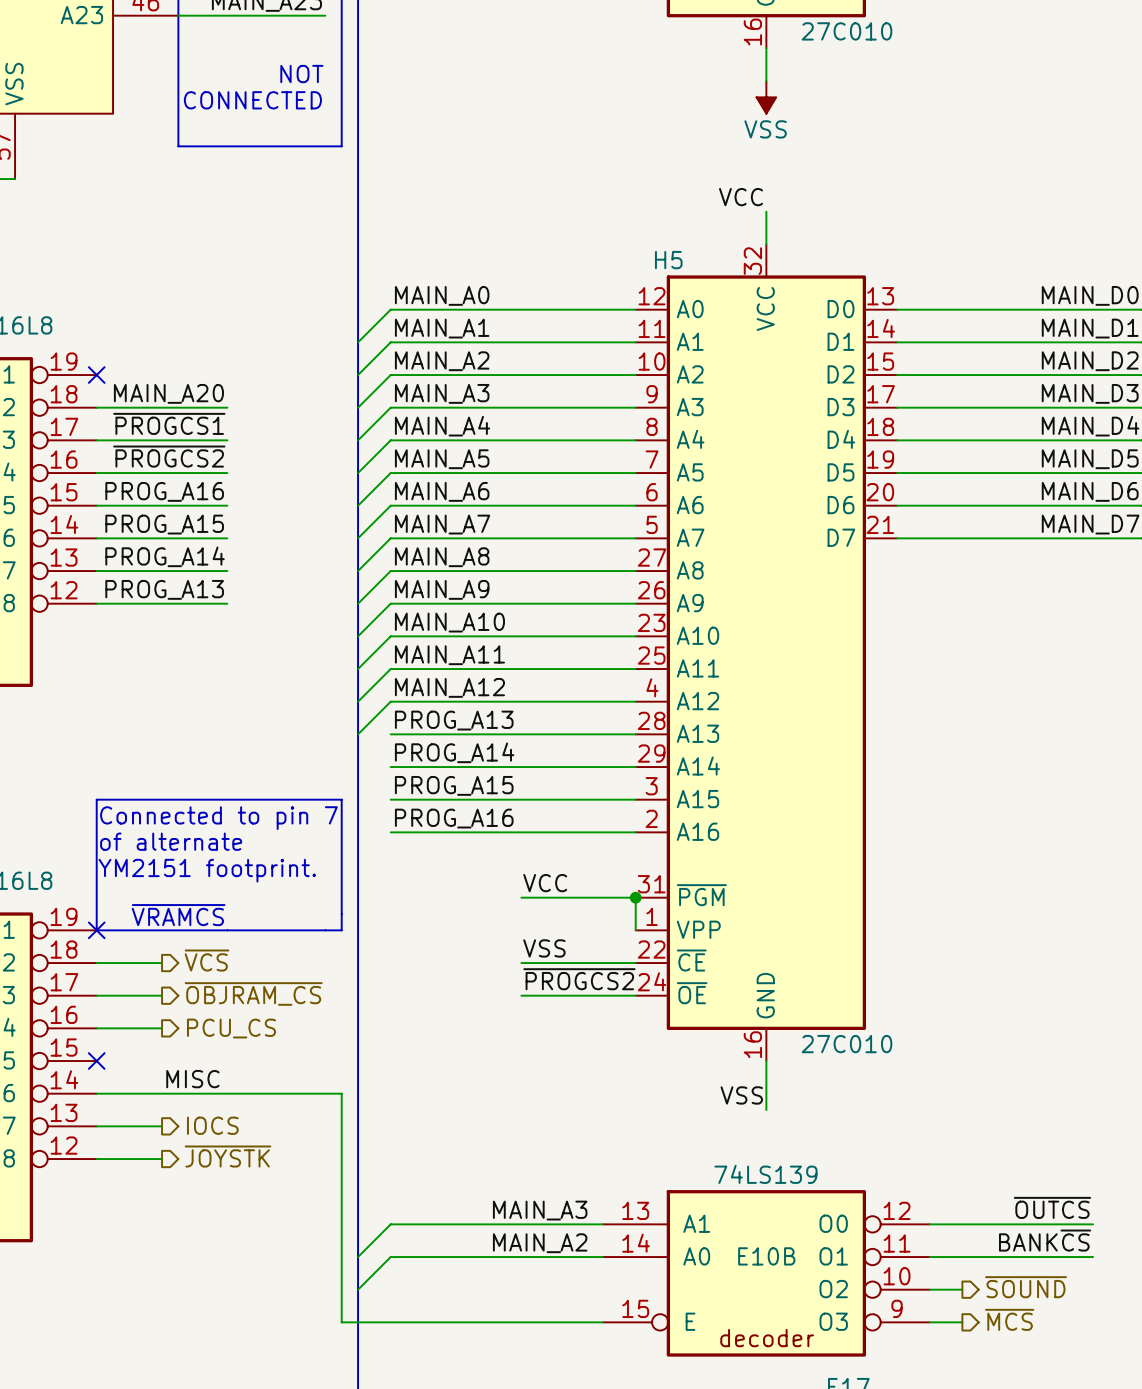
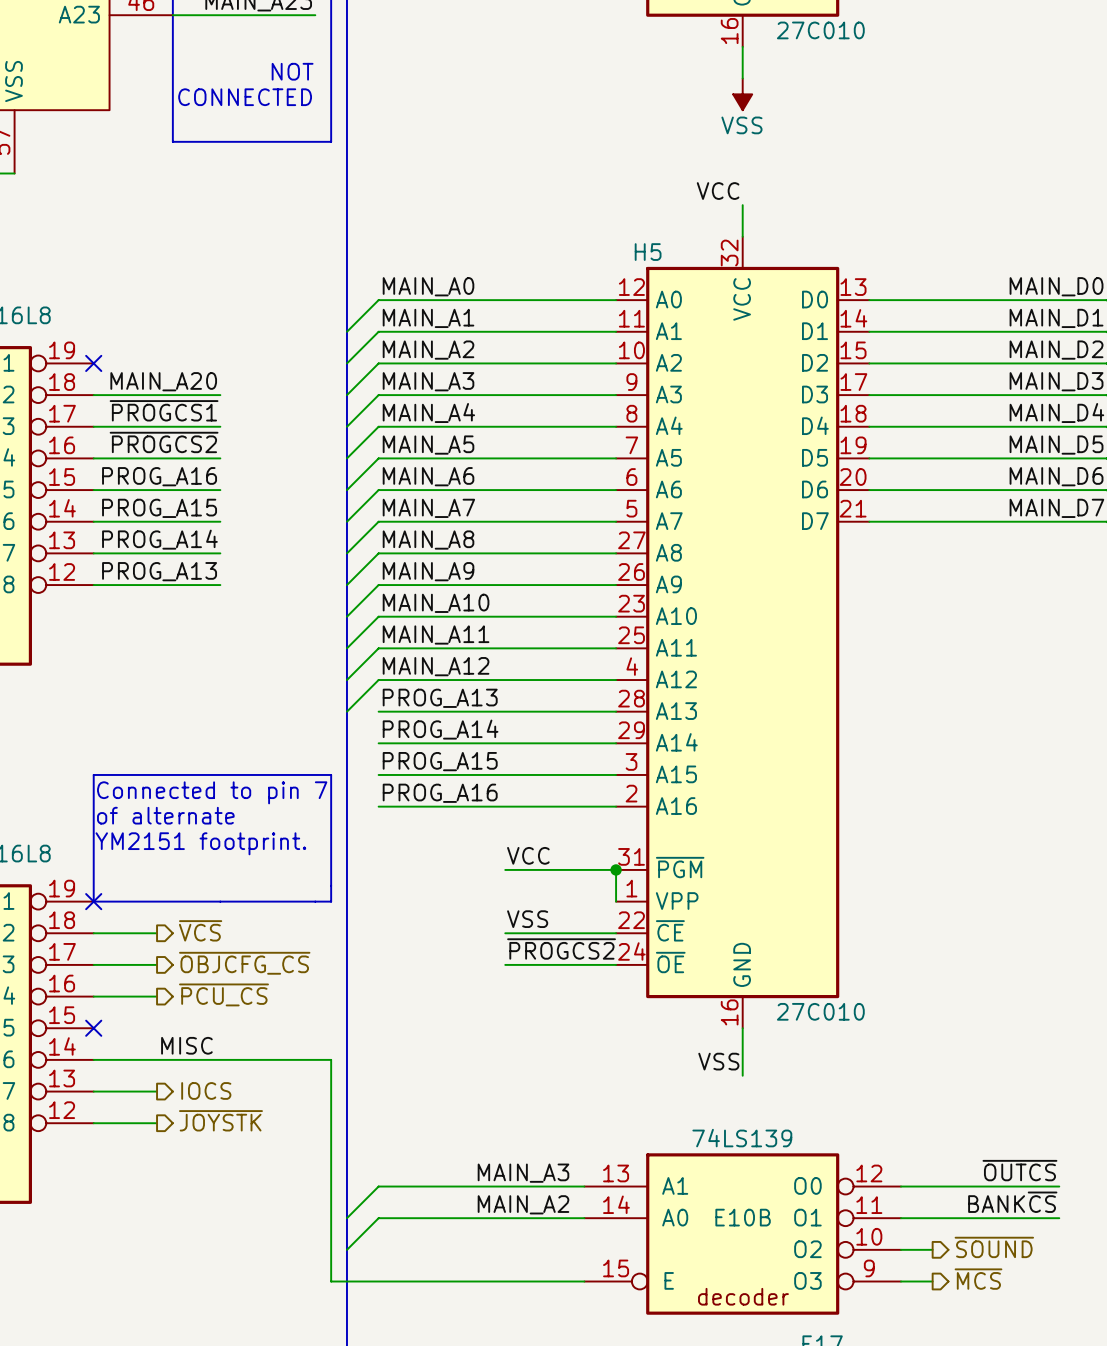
text: ~{VRAMCS} (178, 915) -> none
hierarchical label: ~{OBJRAM_CS} (253, 993) -> ~{OBJCFG_CS} (244, 963)
hierarchical label: PCU_CS (231, 1028) -> ~{PCU_CS} (223, 994)

